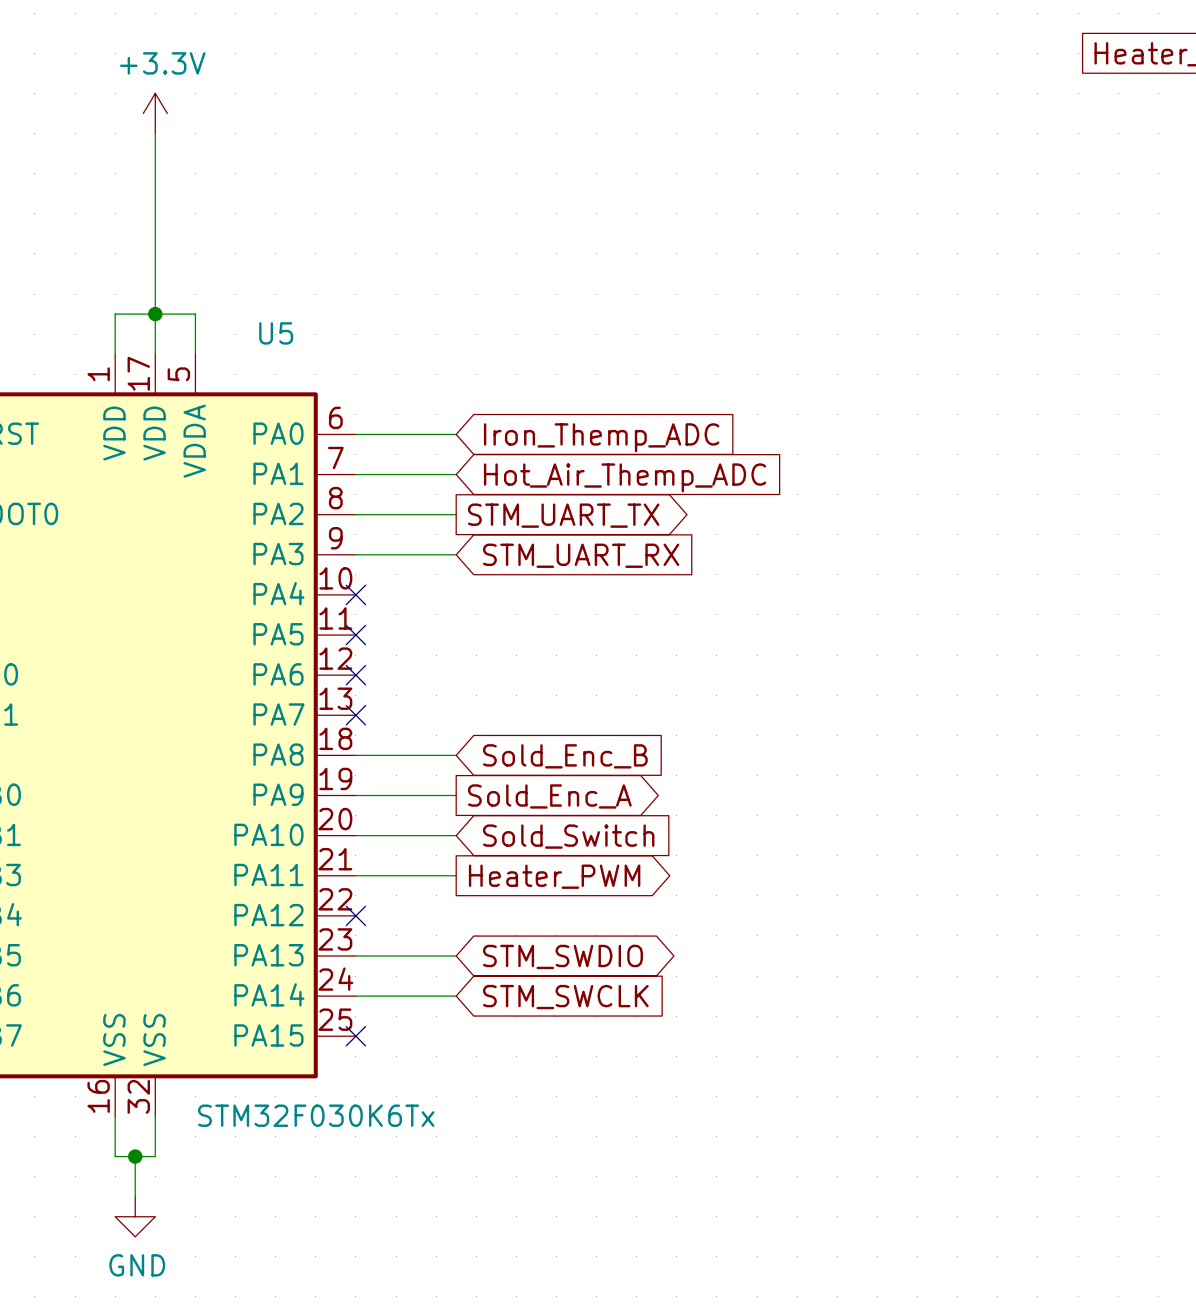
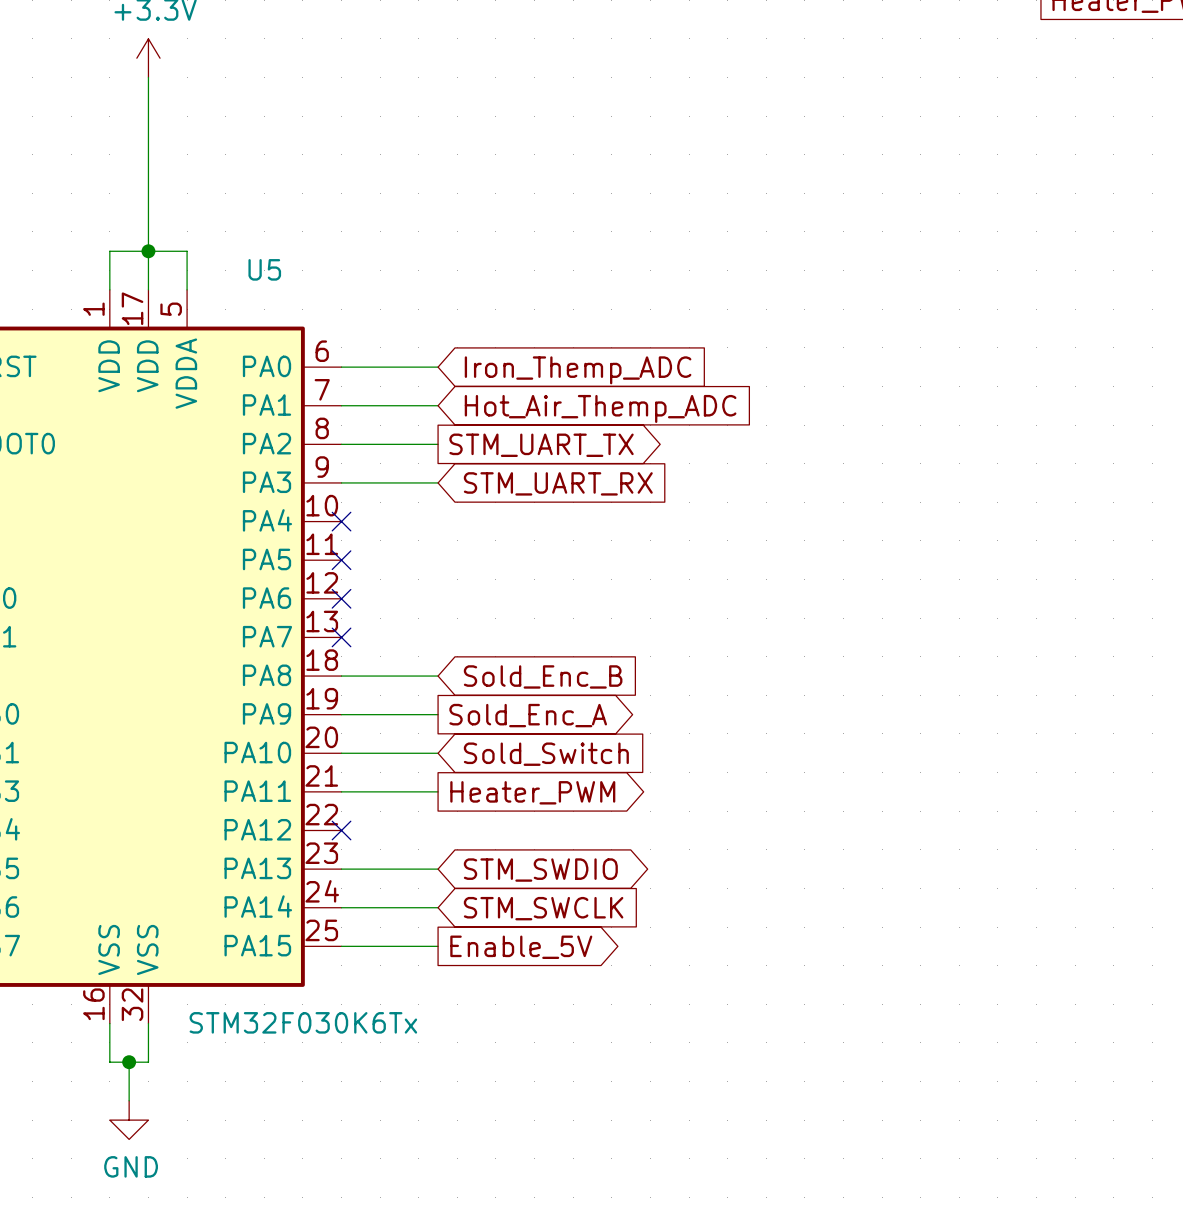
wire: none -> (341, 946) (438, 946)
no-connect mark: (355, 1036) -> none
global label: none -> Enable_5V (521, 947)

